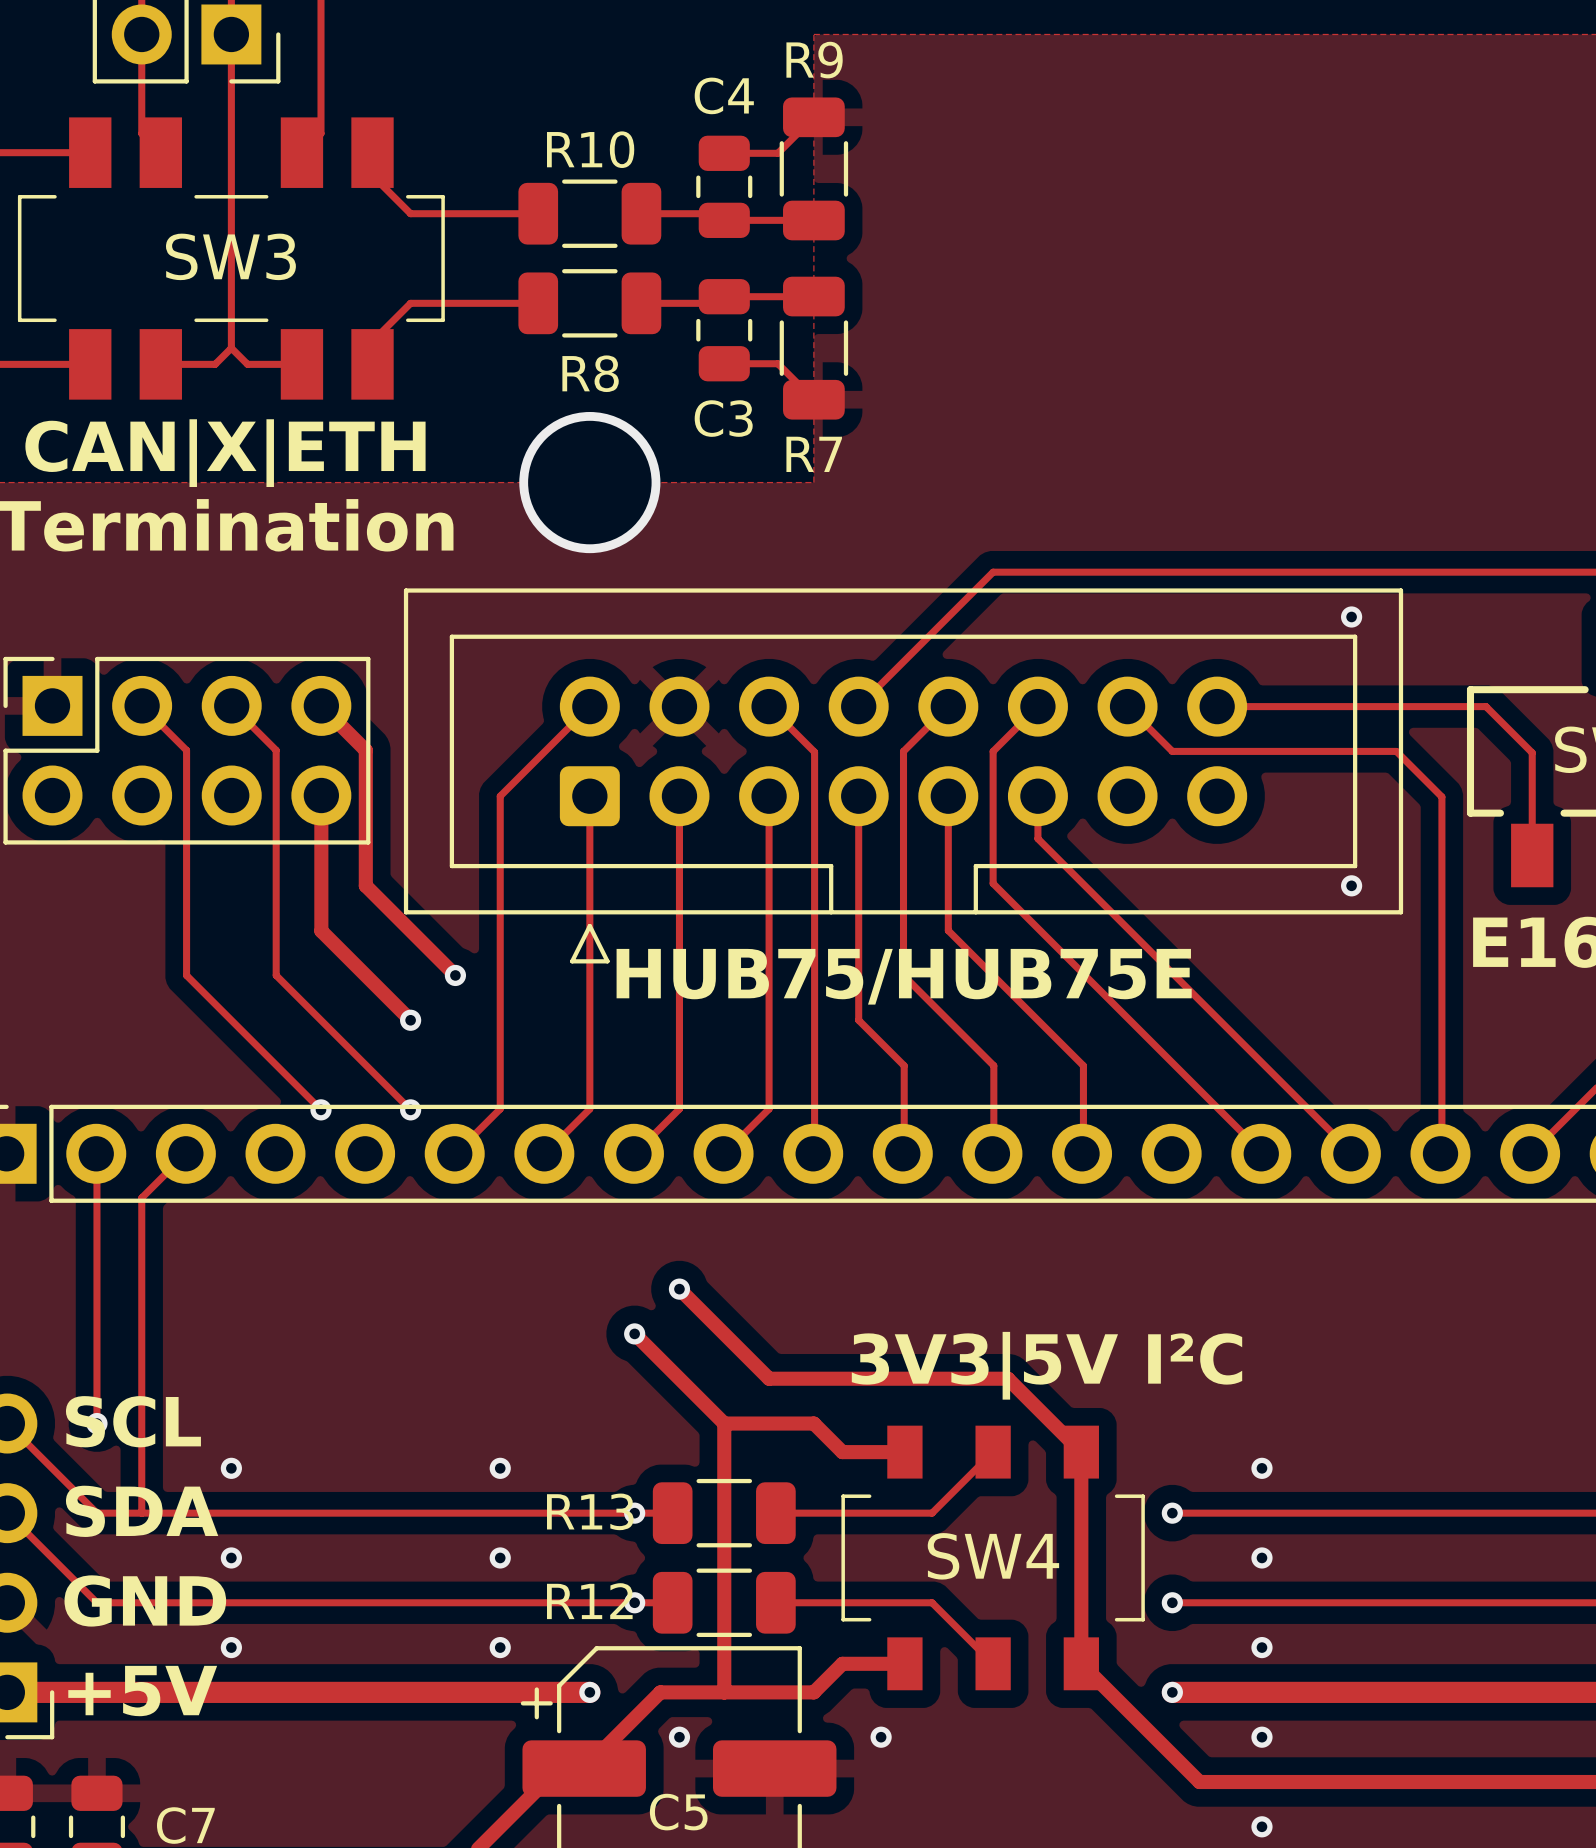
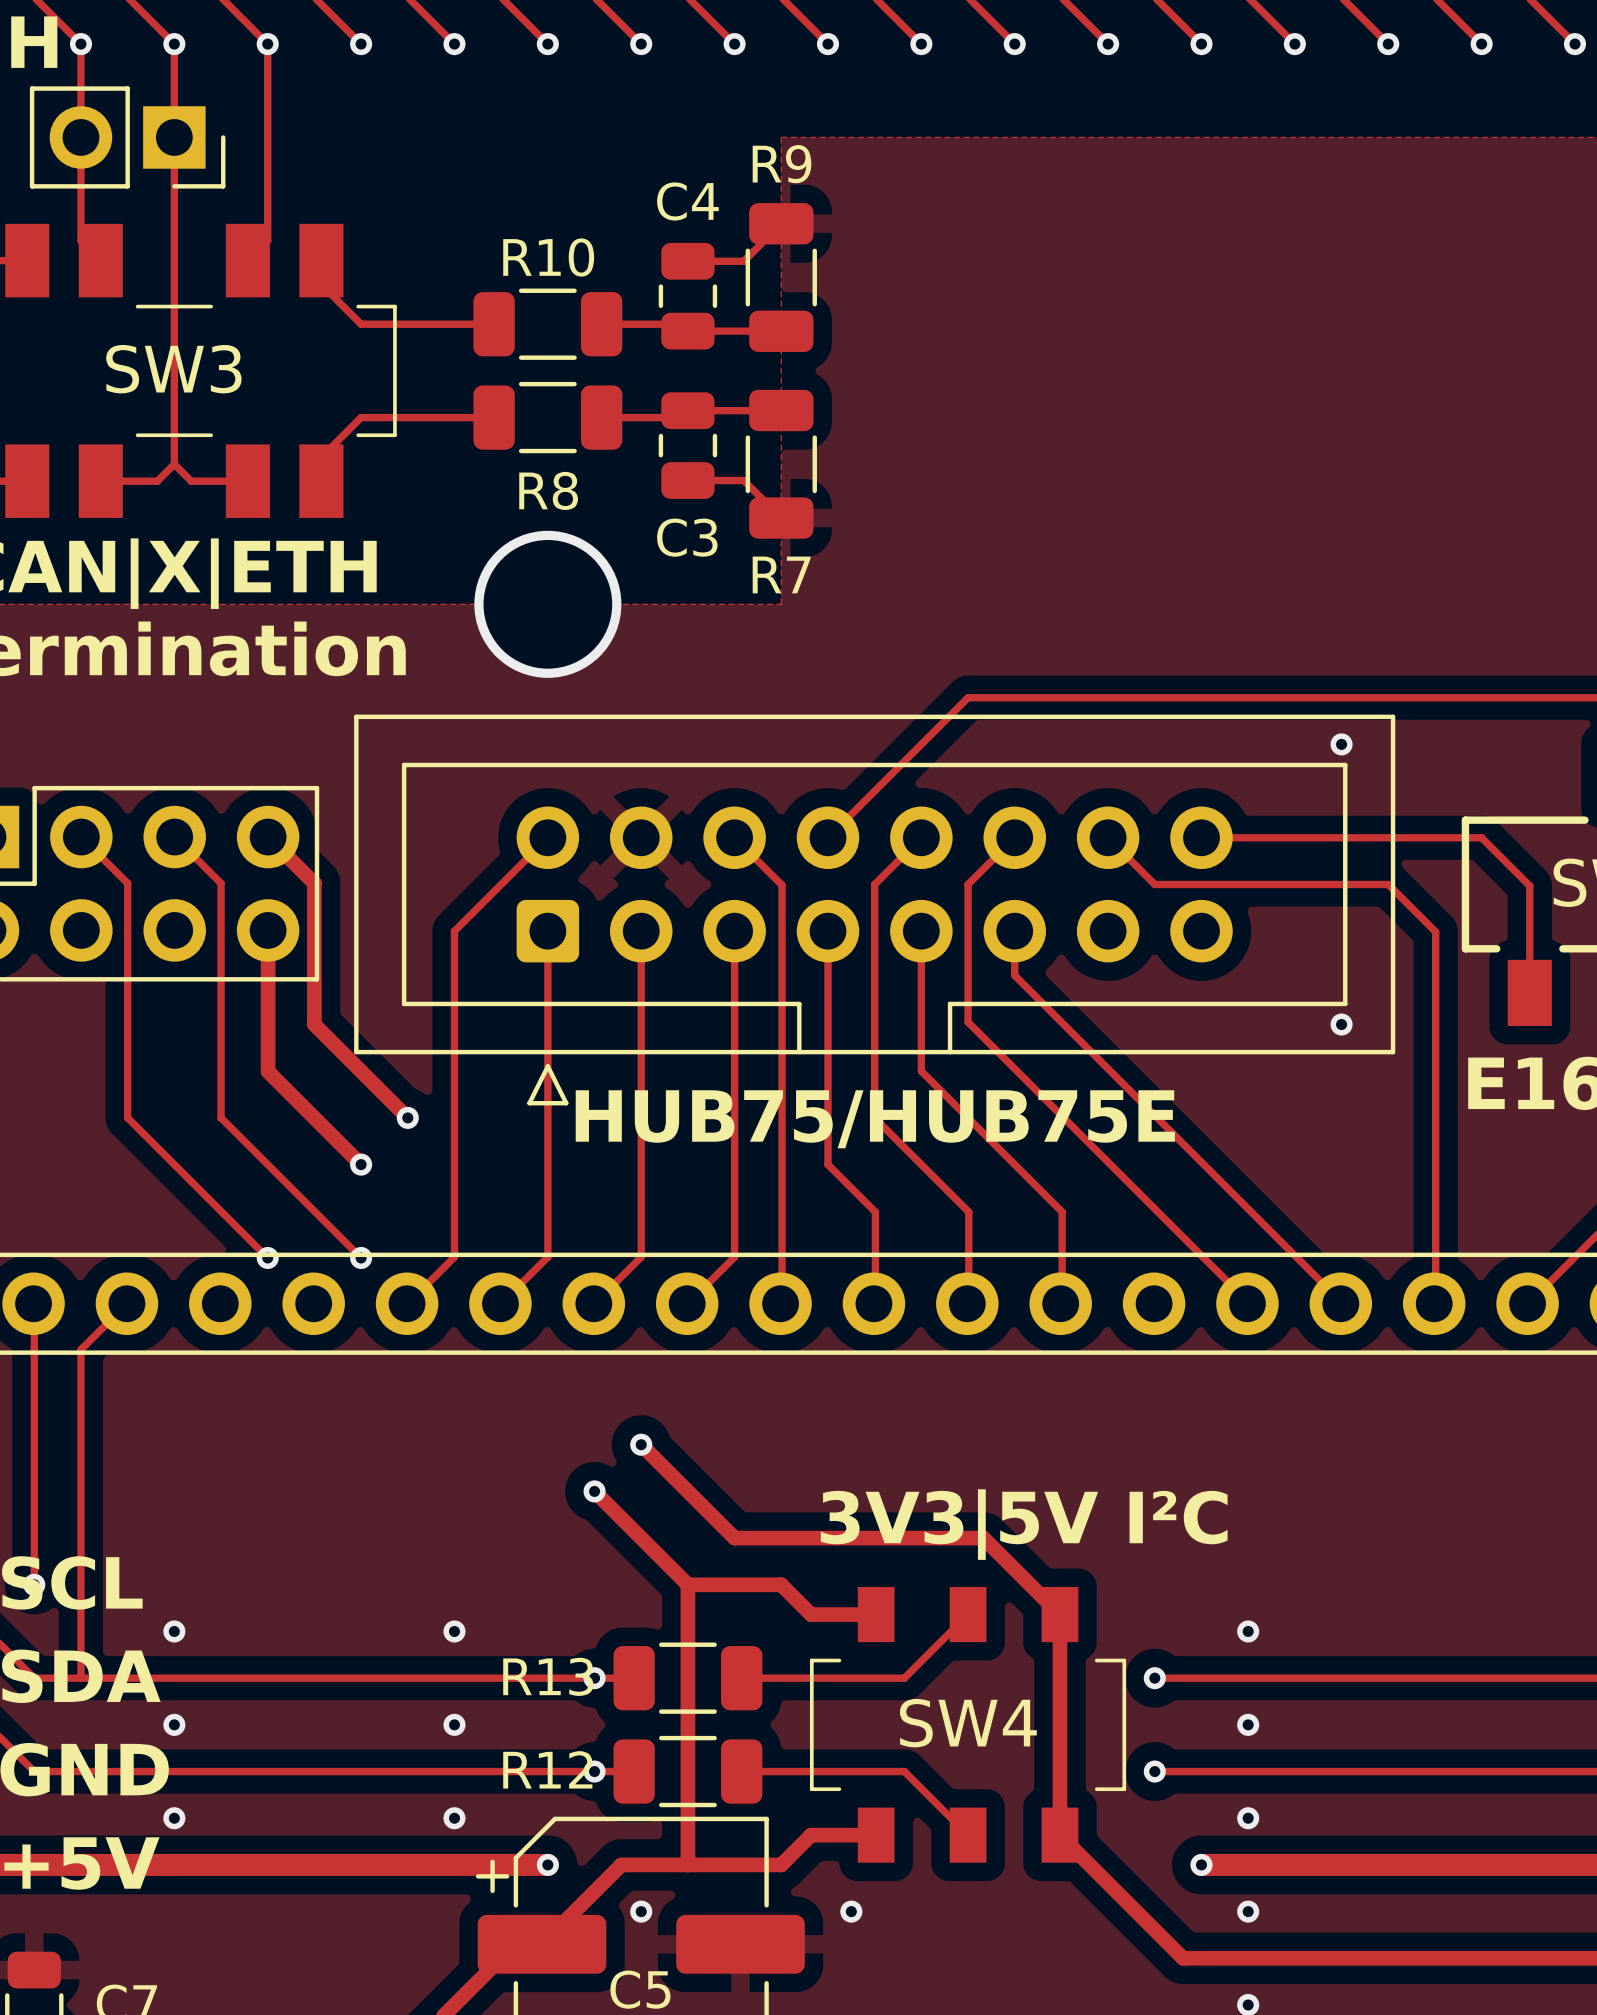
track: (1172, 1692) (1217, 1692) -> none
via position: (1172, 1692) -> (1201, 1864)

